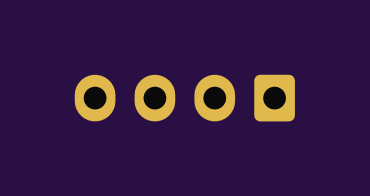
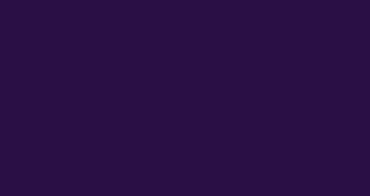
part: (184, 98) -> none

